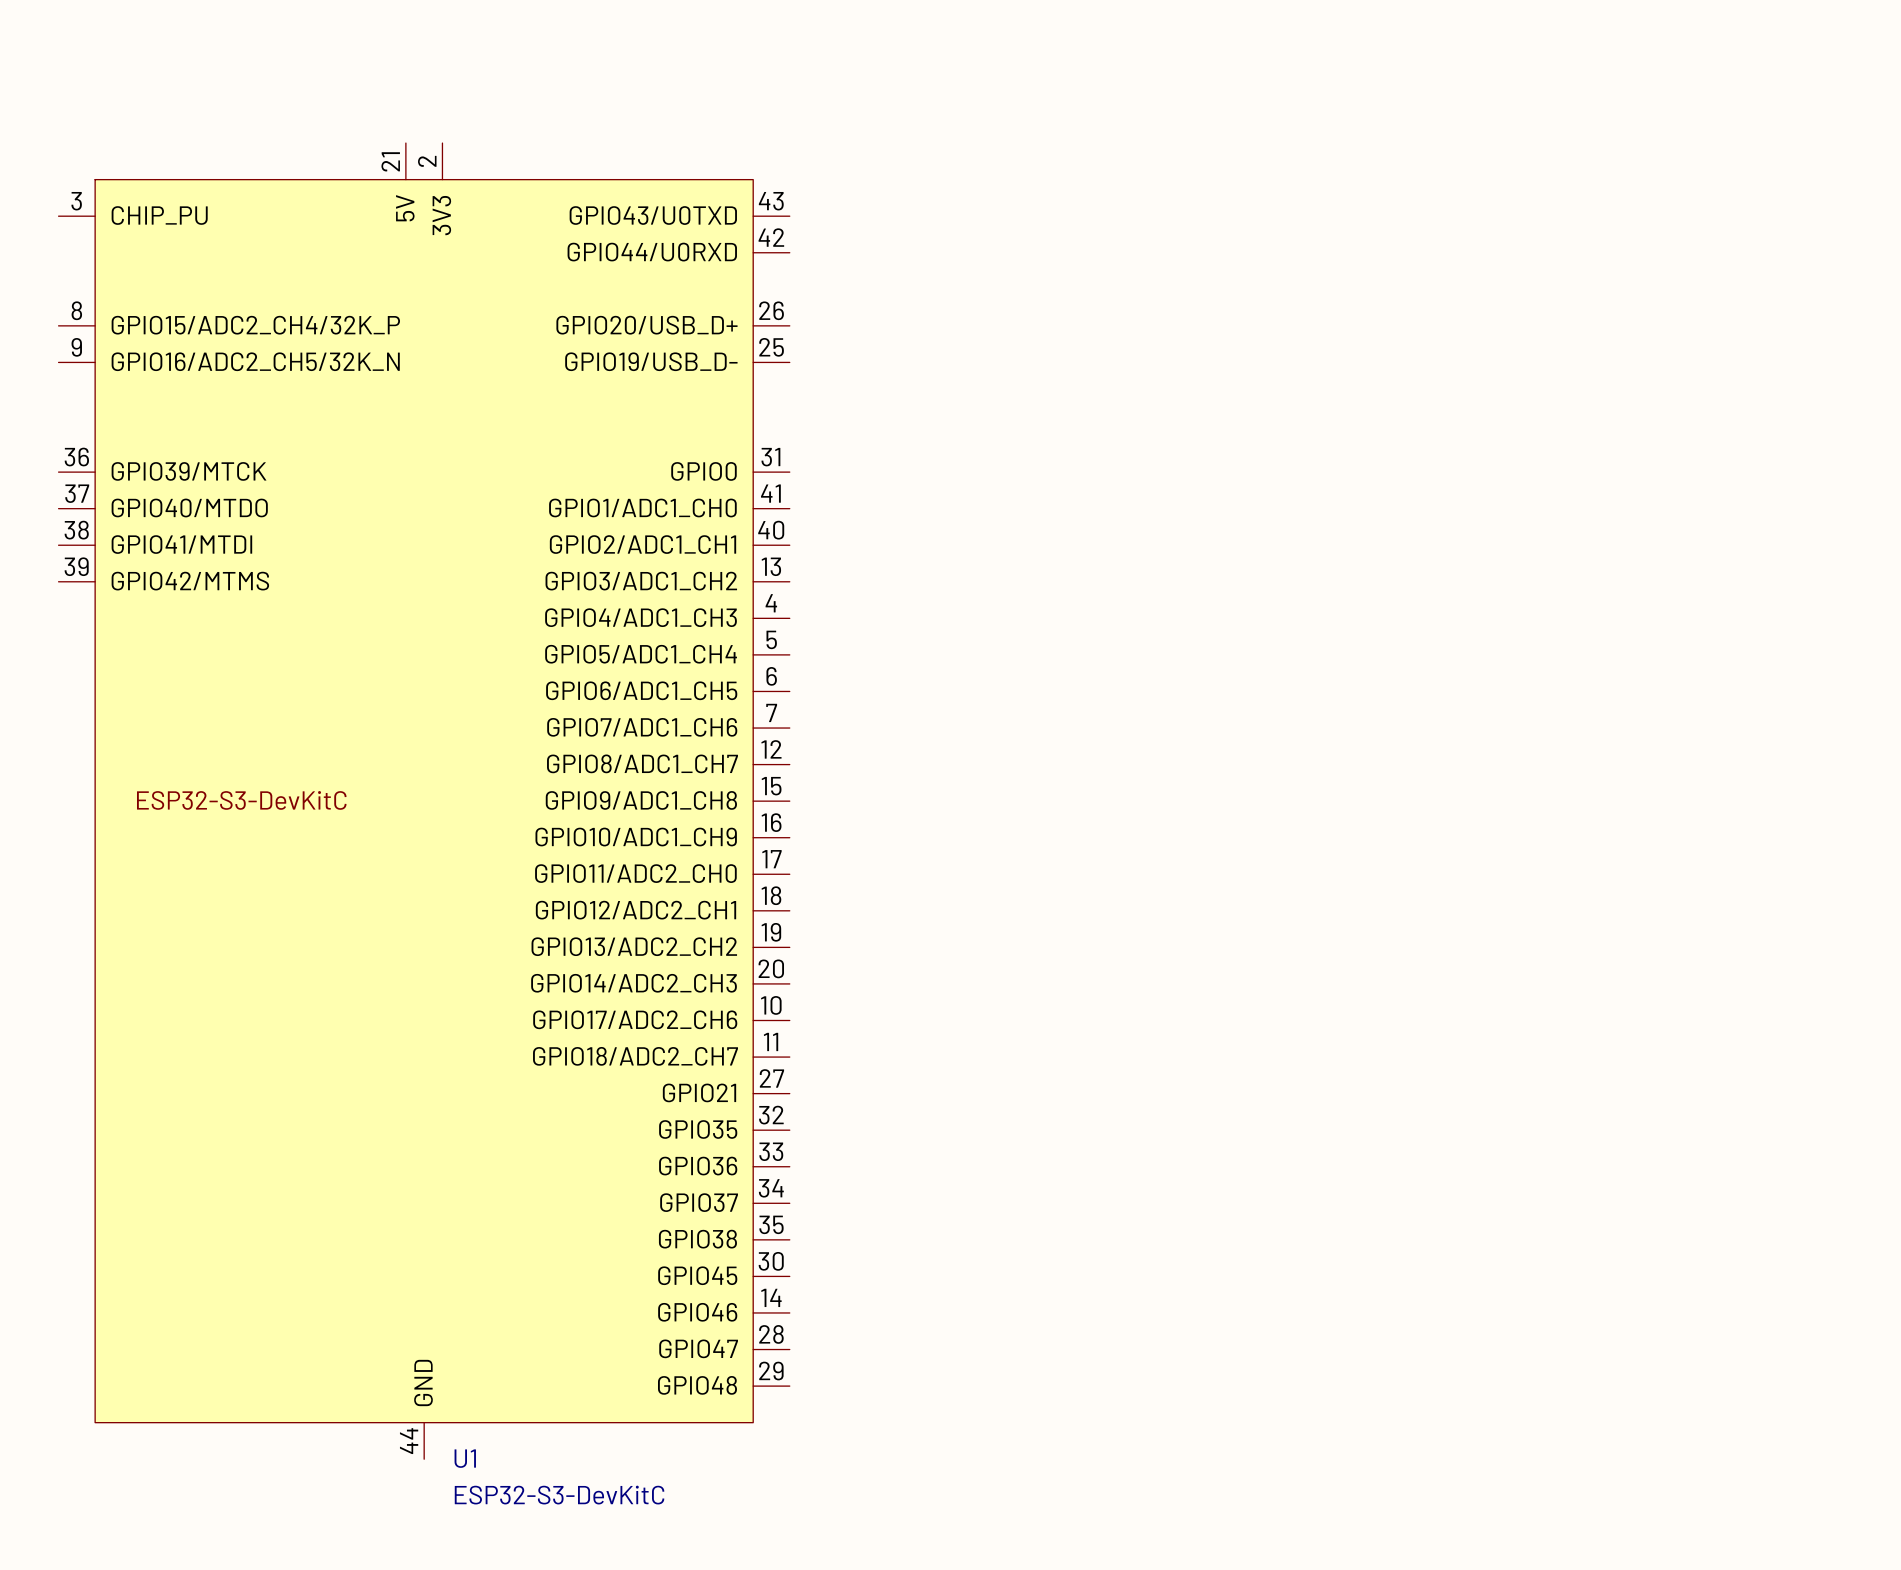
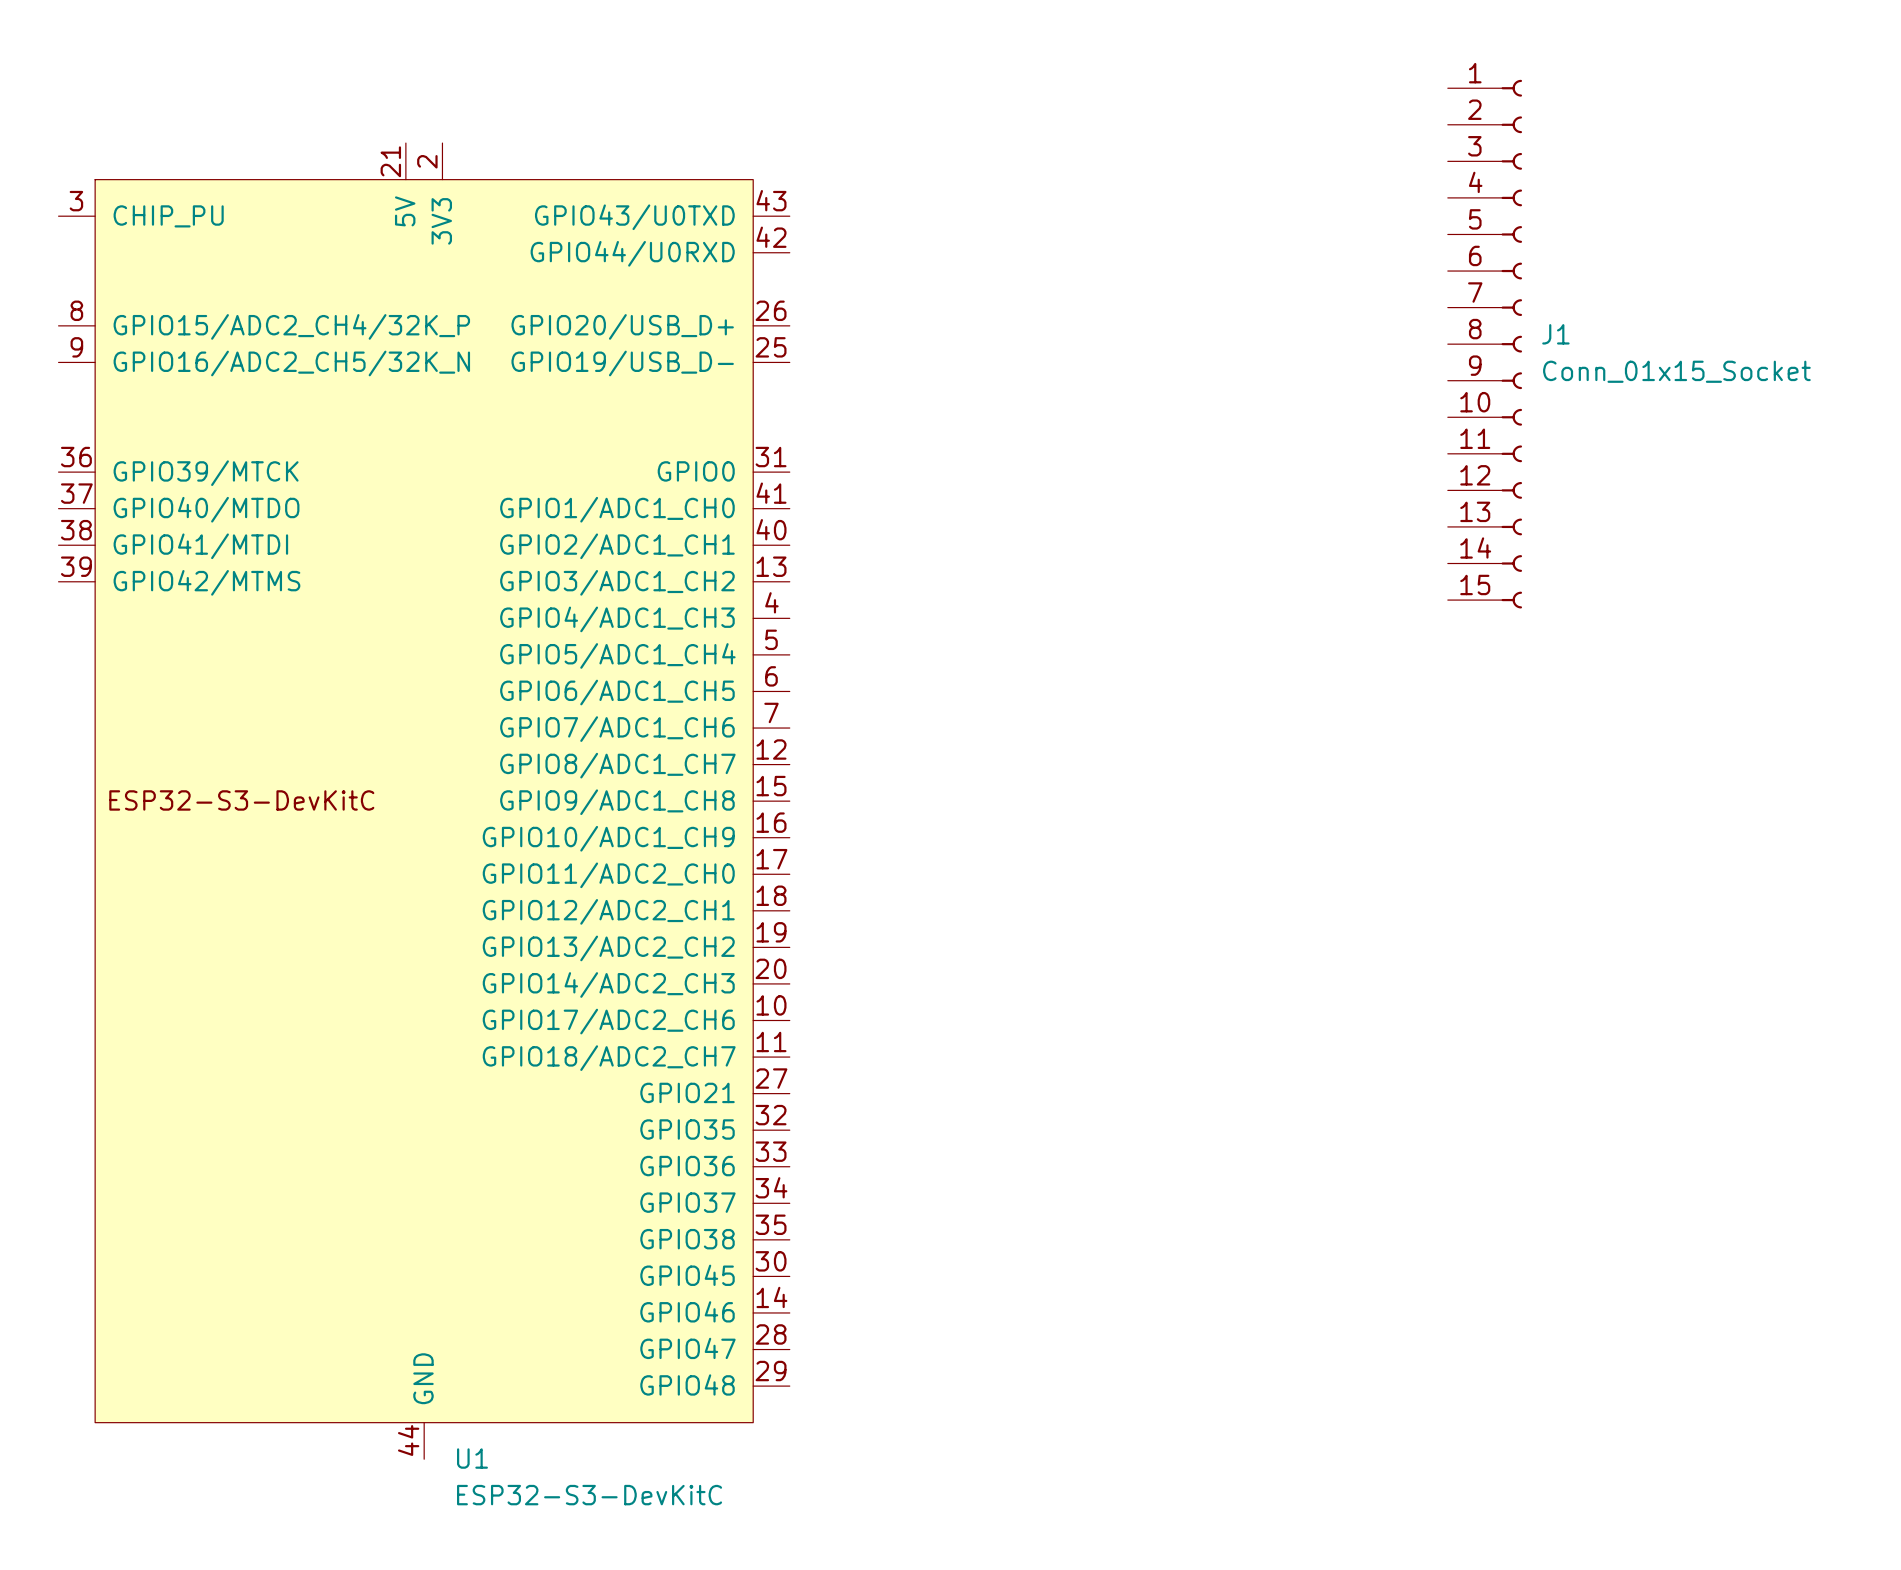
J1: none -> Conn_01x15_Socket (1484, 344)

